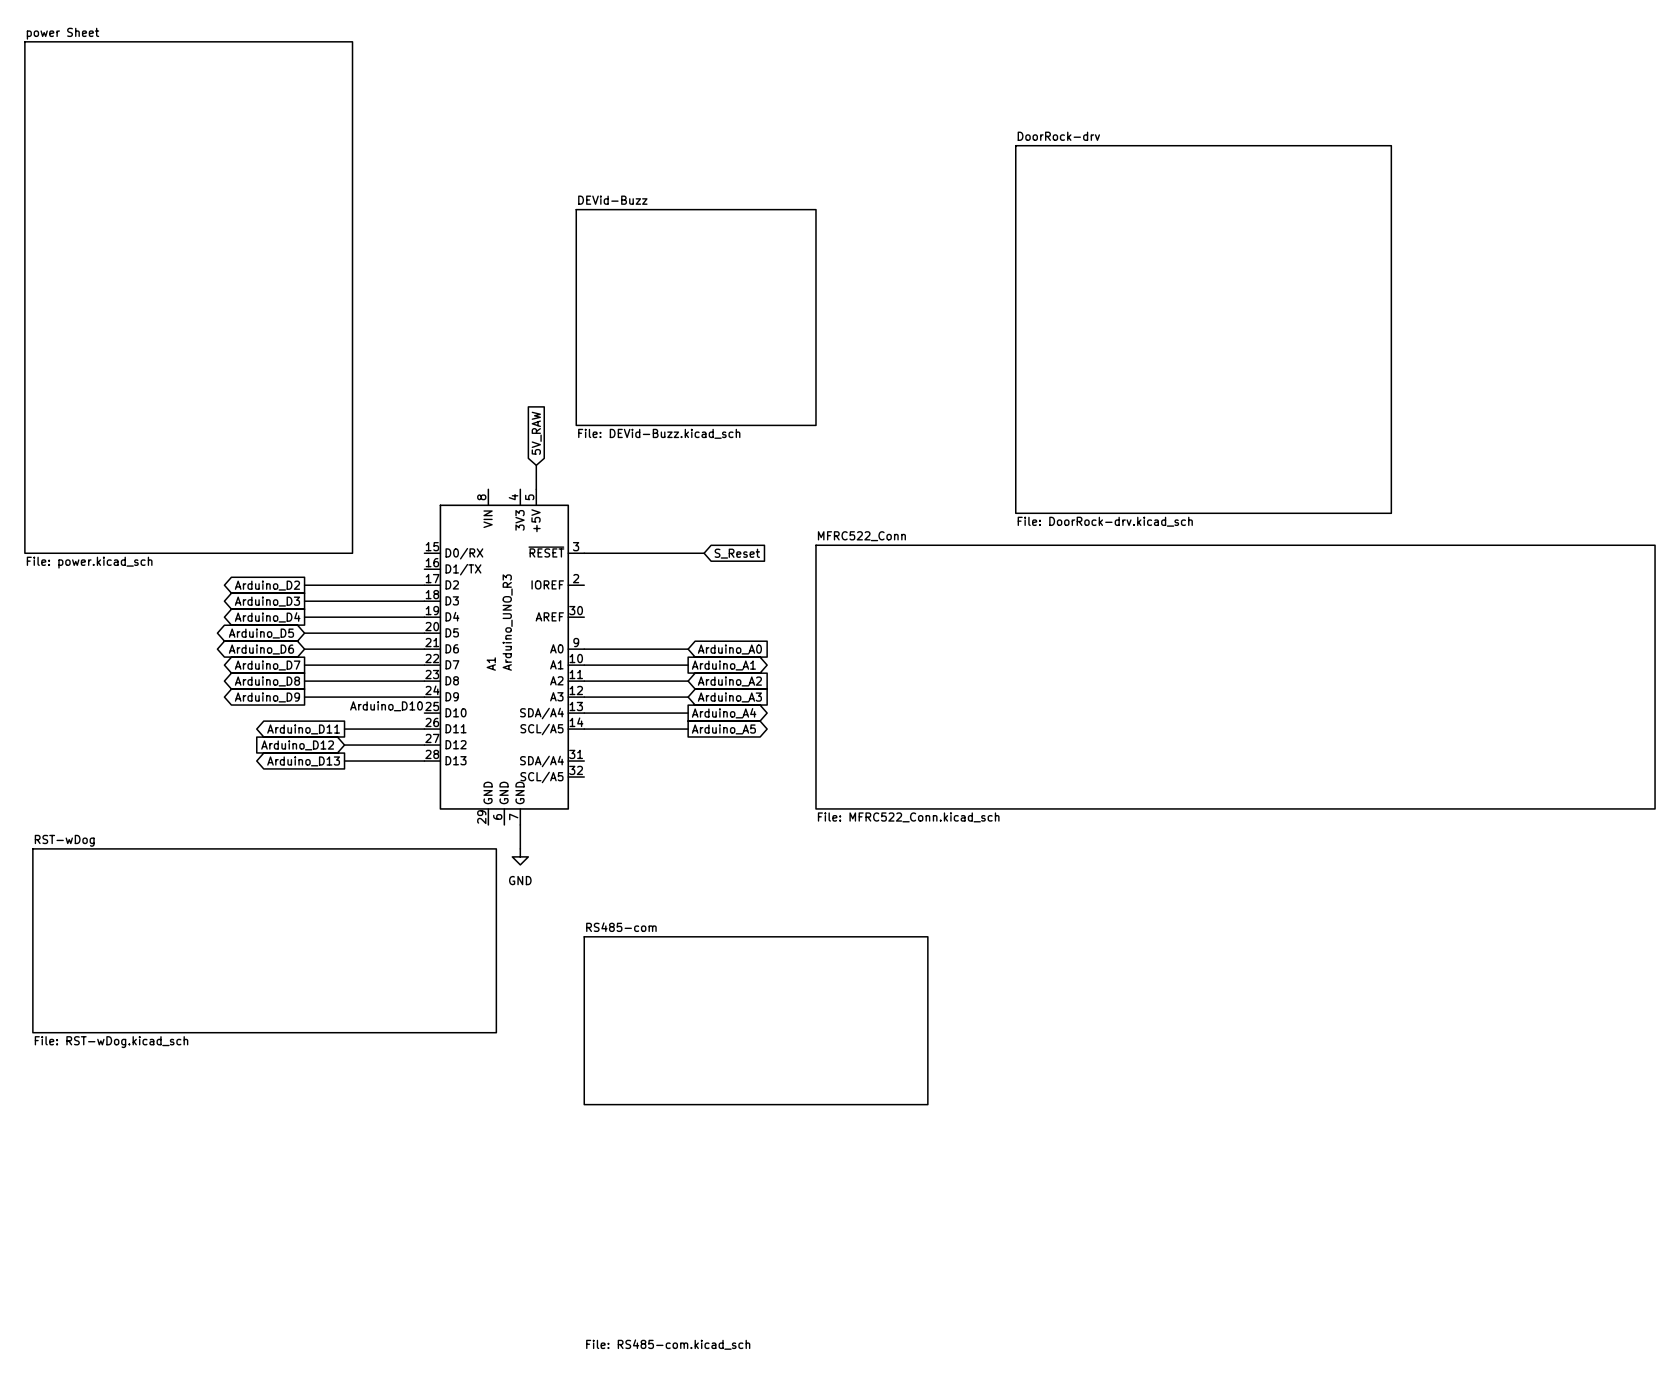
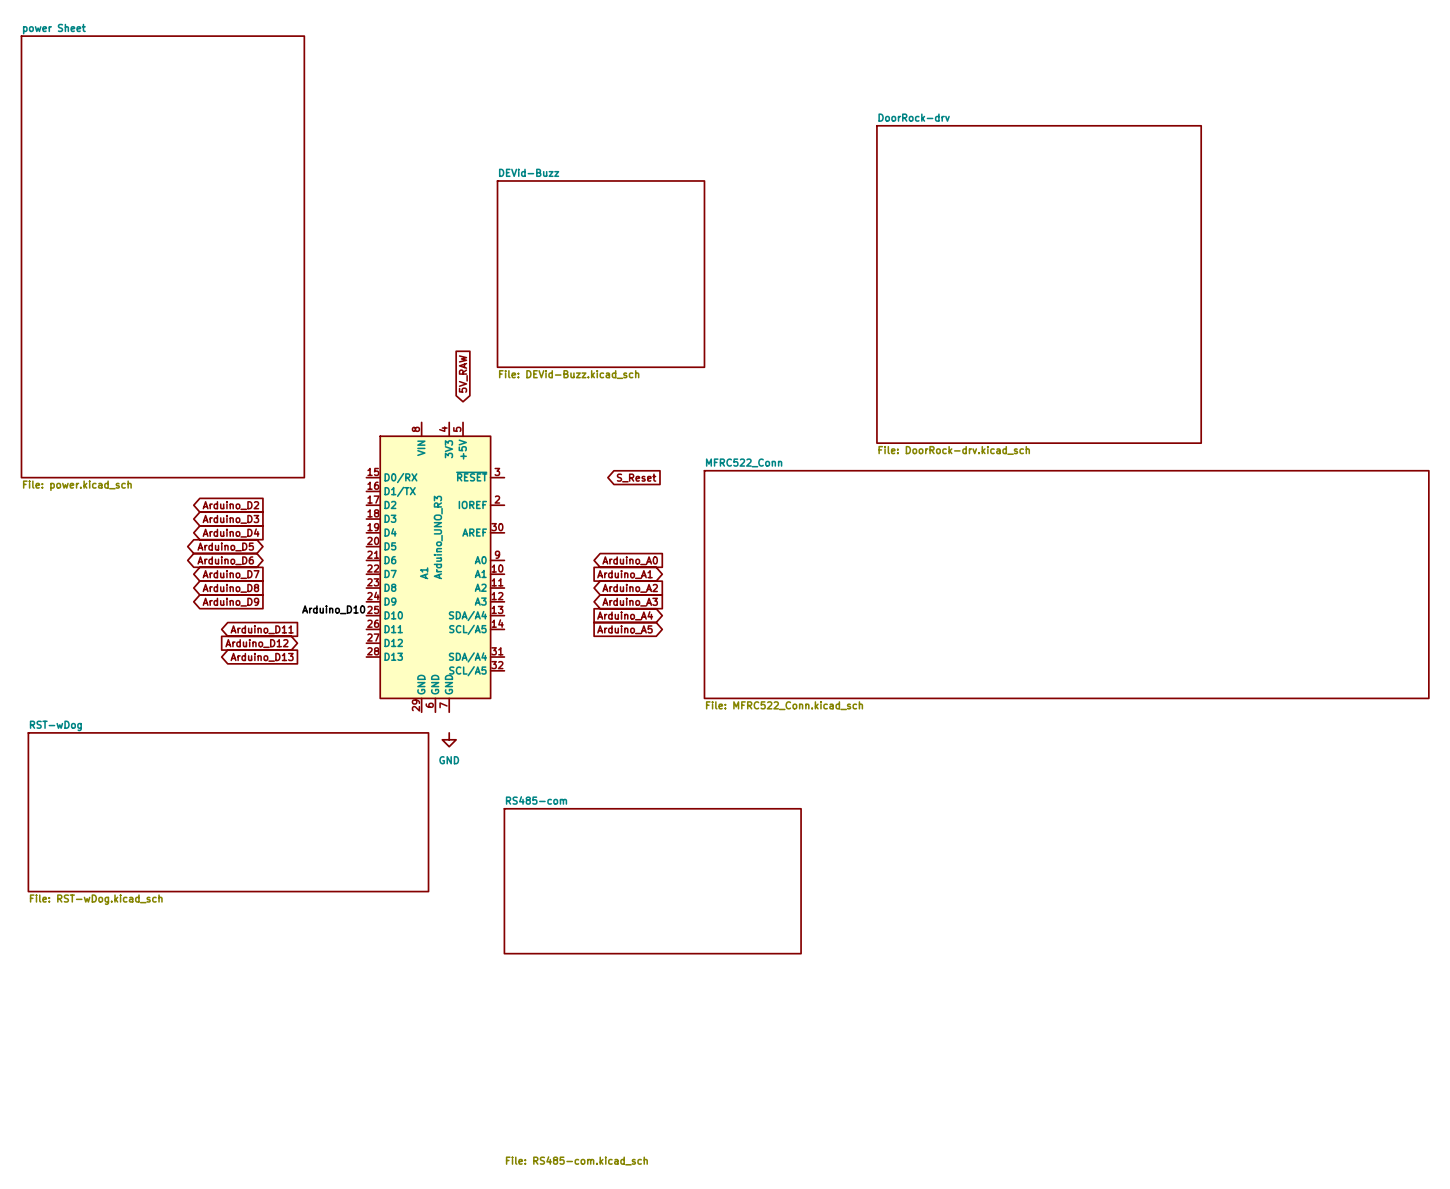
wire: (536, 465) (536, 489) -> none
wire: (584, 553) (704, 553) -> none
wire: (304, 585) (424, 585) -> none
wire: (304, 601) (424, 601) -> none
wire: (304, 617) (424, 617) -> none
wire: (304, 633) (424, 633) -> none
wire: (304, 649) (424, 649) -> none
wire: (584, 649) (688, 649) -> none
wire: (304, 665) (424, 665) -> none
wire: (584, 665) (688, 665) -> none
wire: (304, 681) (424, 681) -> none
wire: (584, 681) (688, 681) -> none
wire: (304, 697) (424, 697) -> none
wire: (584, 697) (688, 697) -> none
wire: (584, 713) (688, 713) -> none
wire: (344, 729) (424, 729) -> none
wire: (584, 729) (688, 729) -> none
wire: (344, 745) (424, 745) -> none
wire: (344, 761) (424, 761) -> none
wire: (520, 824) (520, 848) -> none

